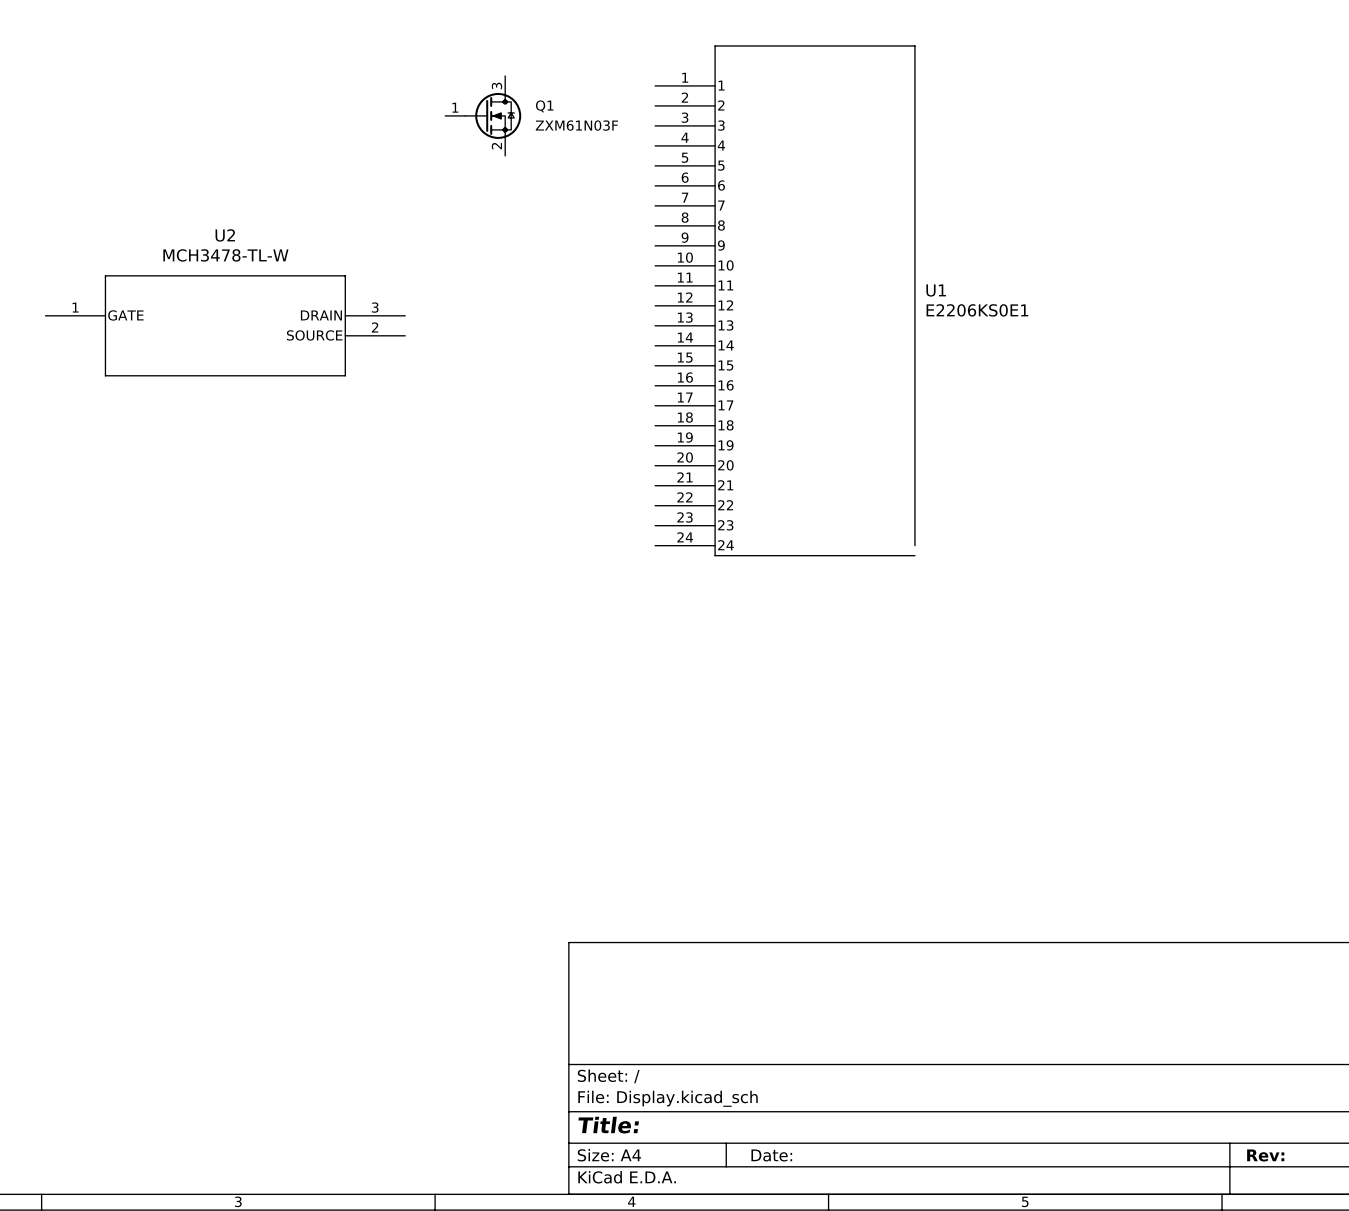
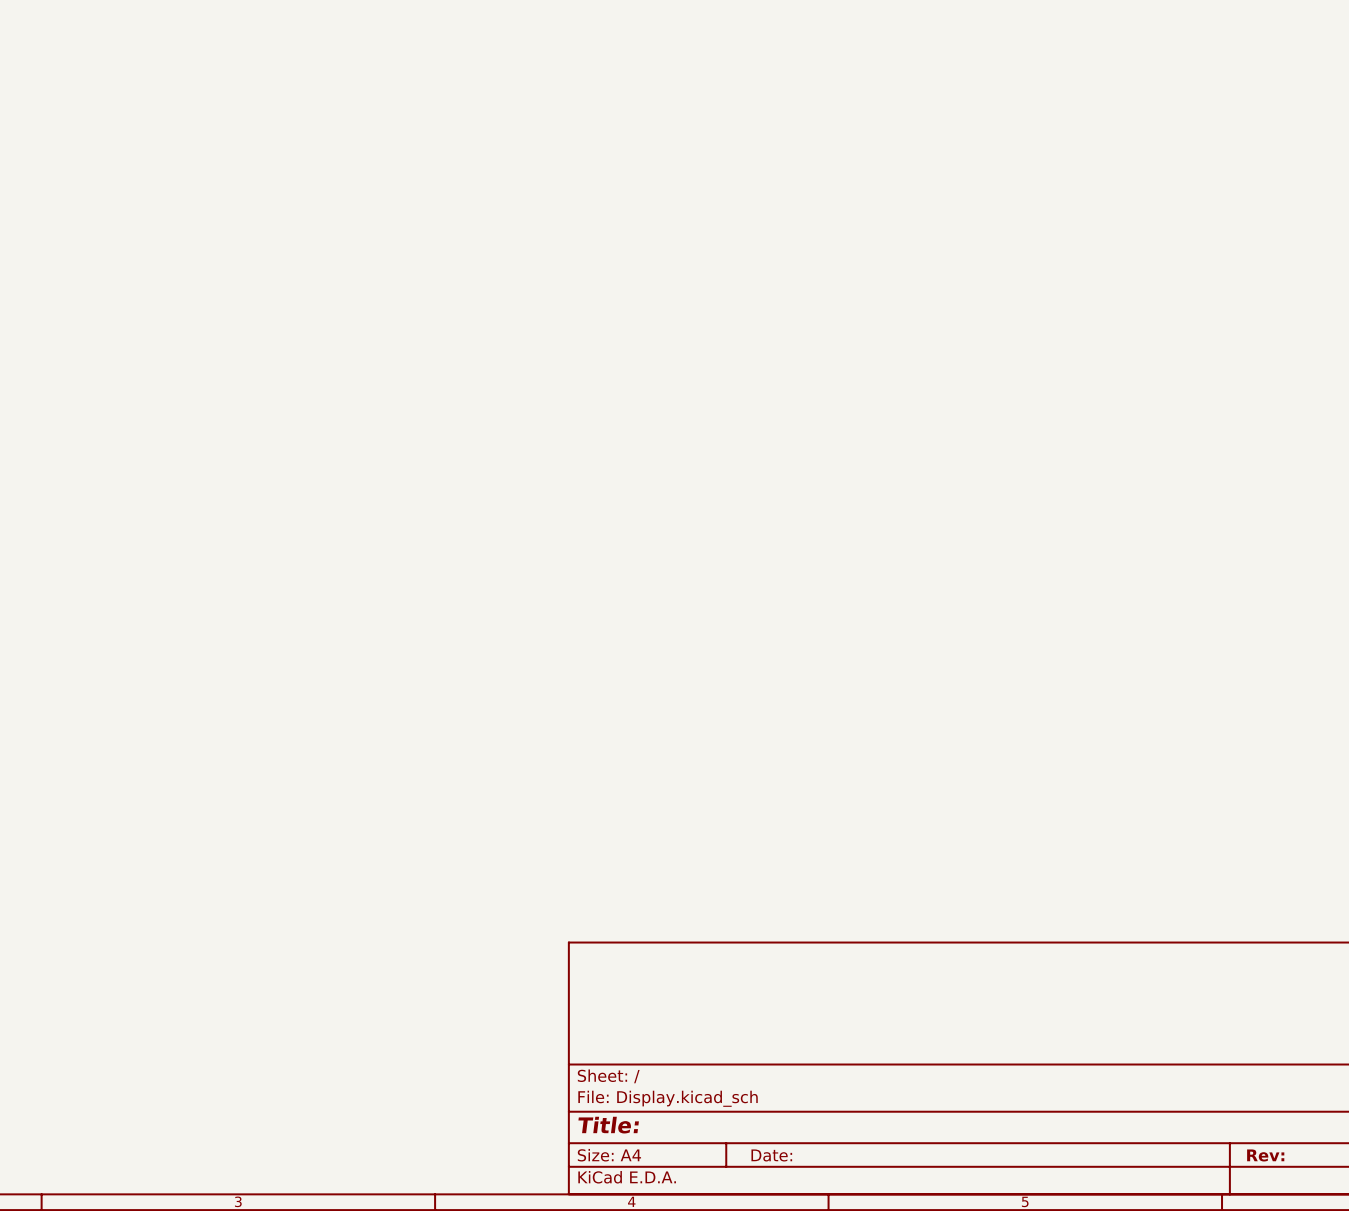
Q1: ZXM61N03F (483, 115) -> none
U1: E2206KS0E1 (785, 300) -> none
U2: MCH3478-TL-W (225, 325) -> none

